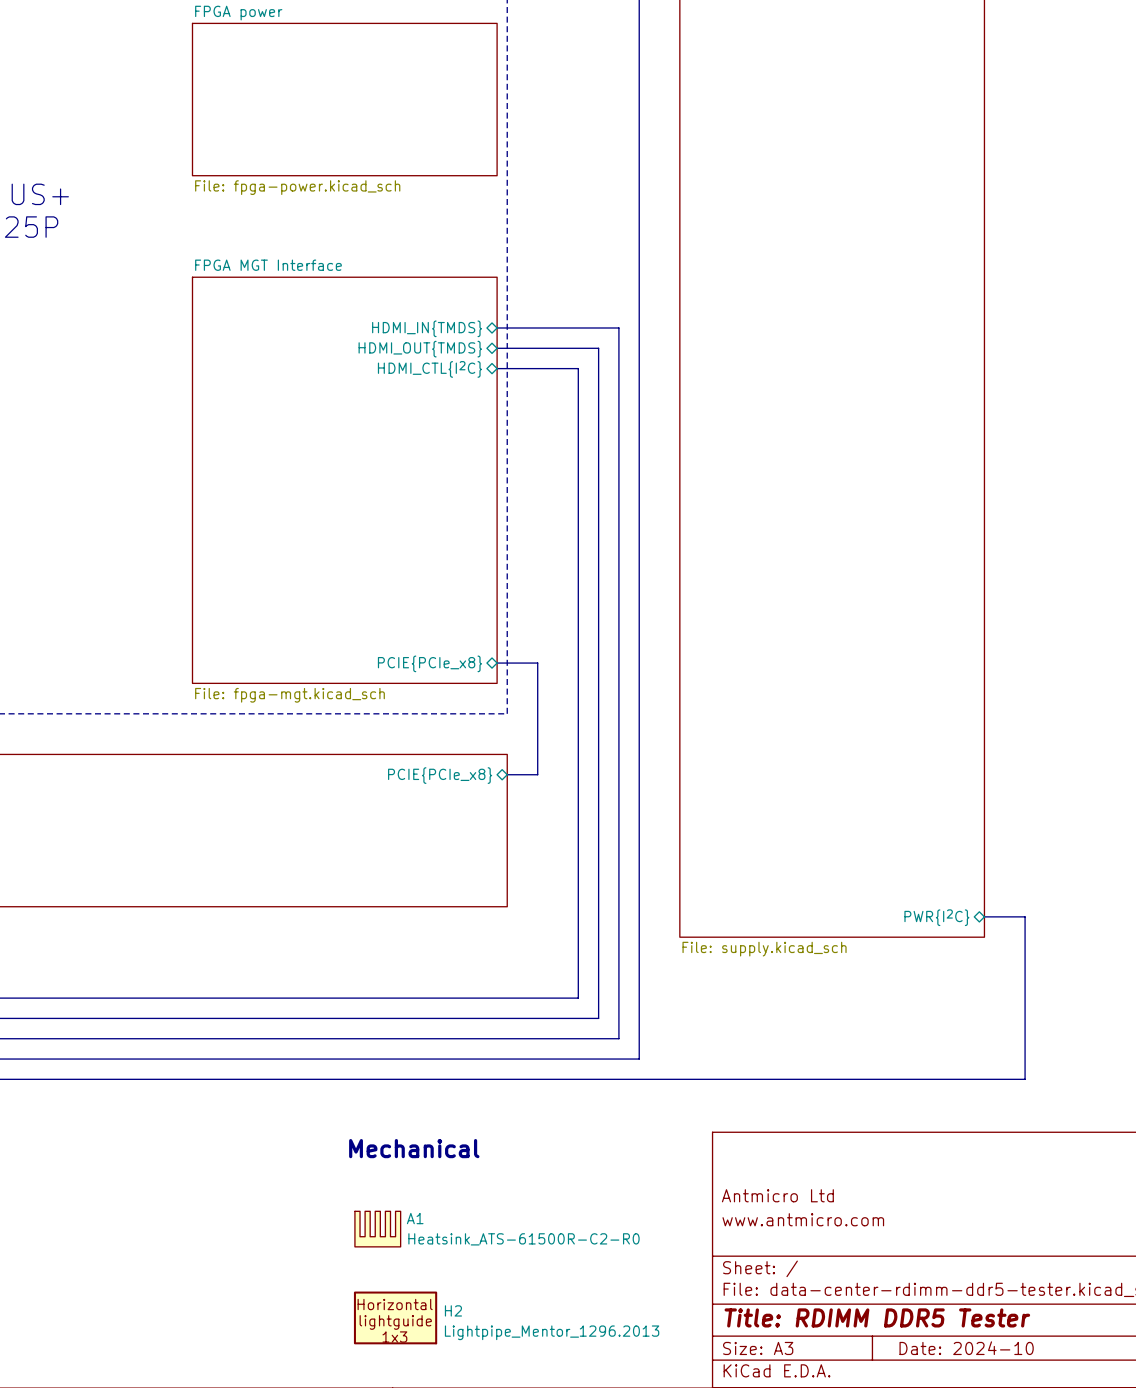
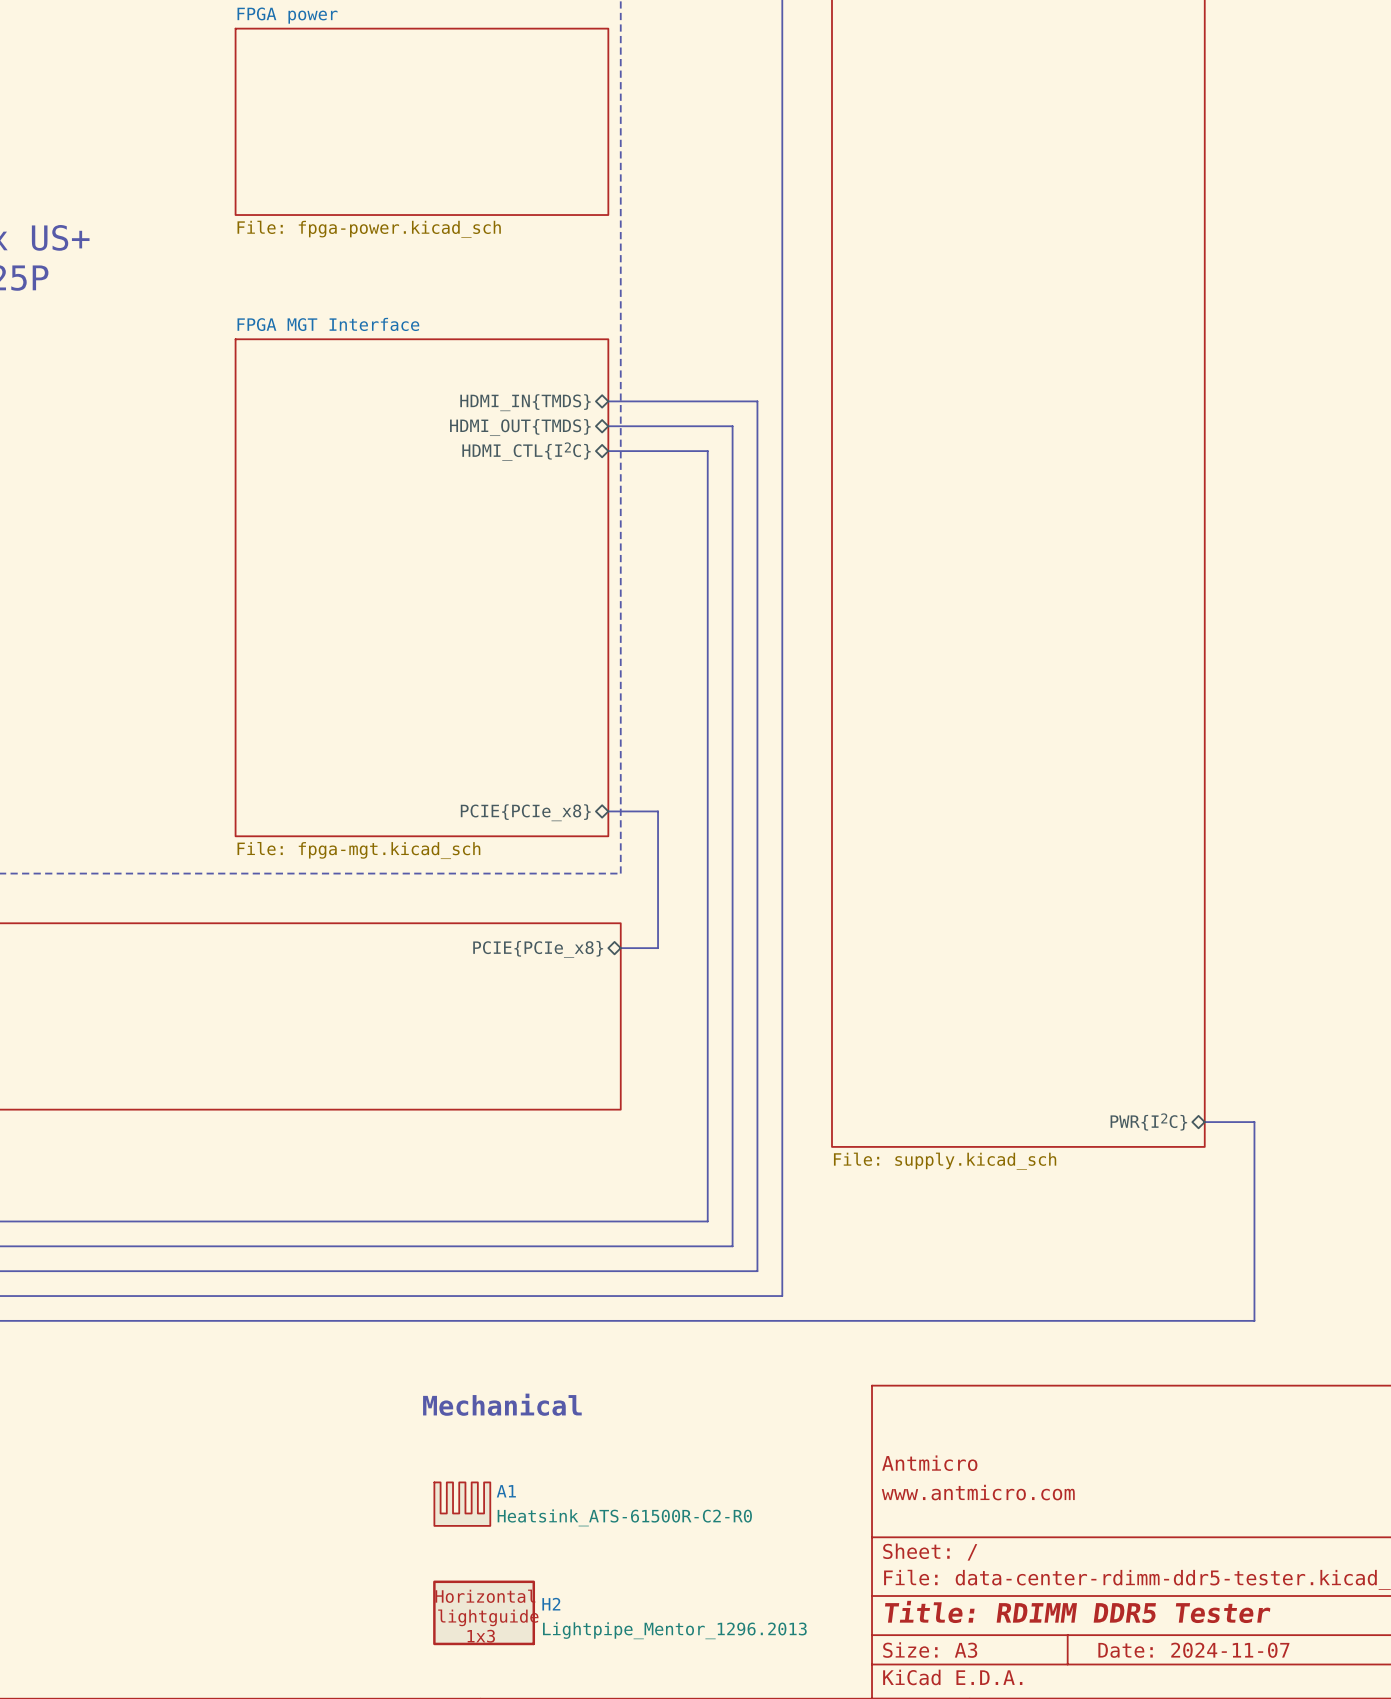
title block: Antmicro Ltd (777, 1195) -> Antmicro (929, 1463)
title block: Date: 2024-10 (966, 1348) -> Date: 2024-11-07 (1193, 1650)

